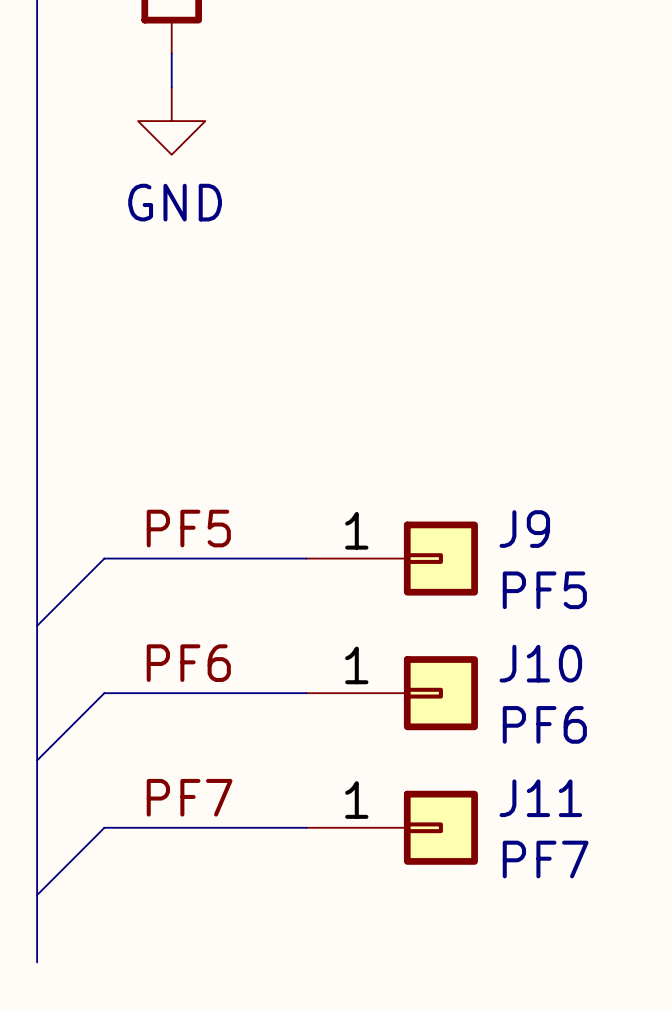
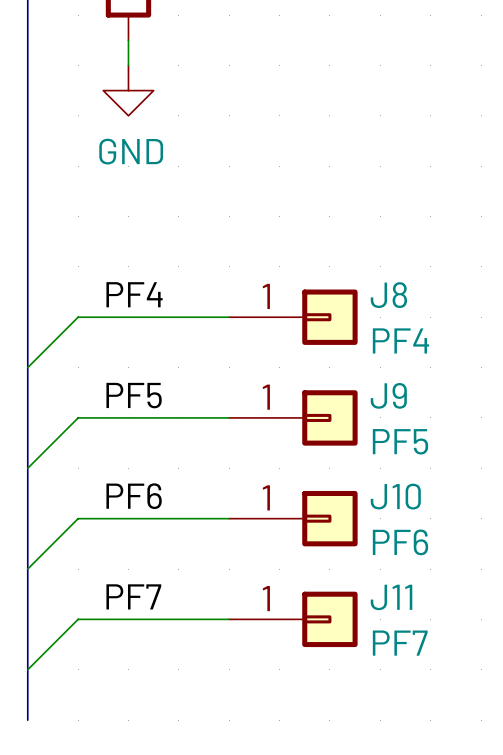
label: none -> PF4 (134, 294)
wire: none -> (229, 317) (78, 317) (27, 367)
J8: none -> PF4 (293, 317)

